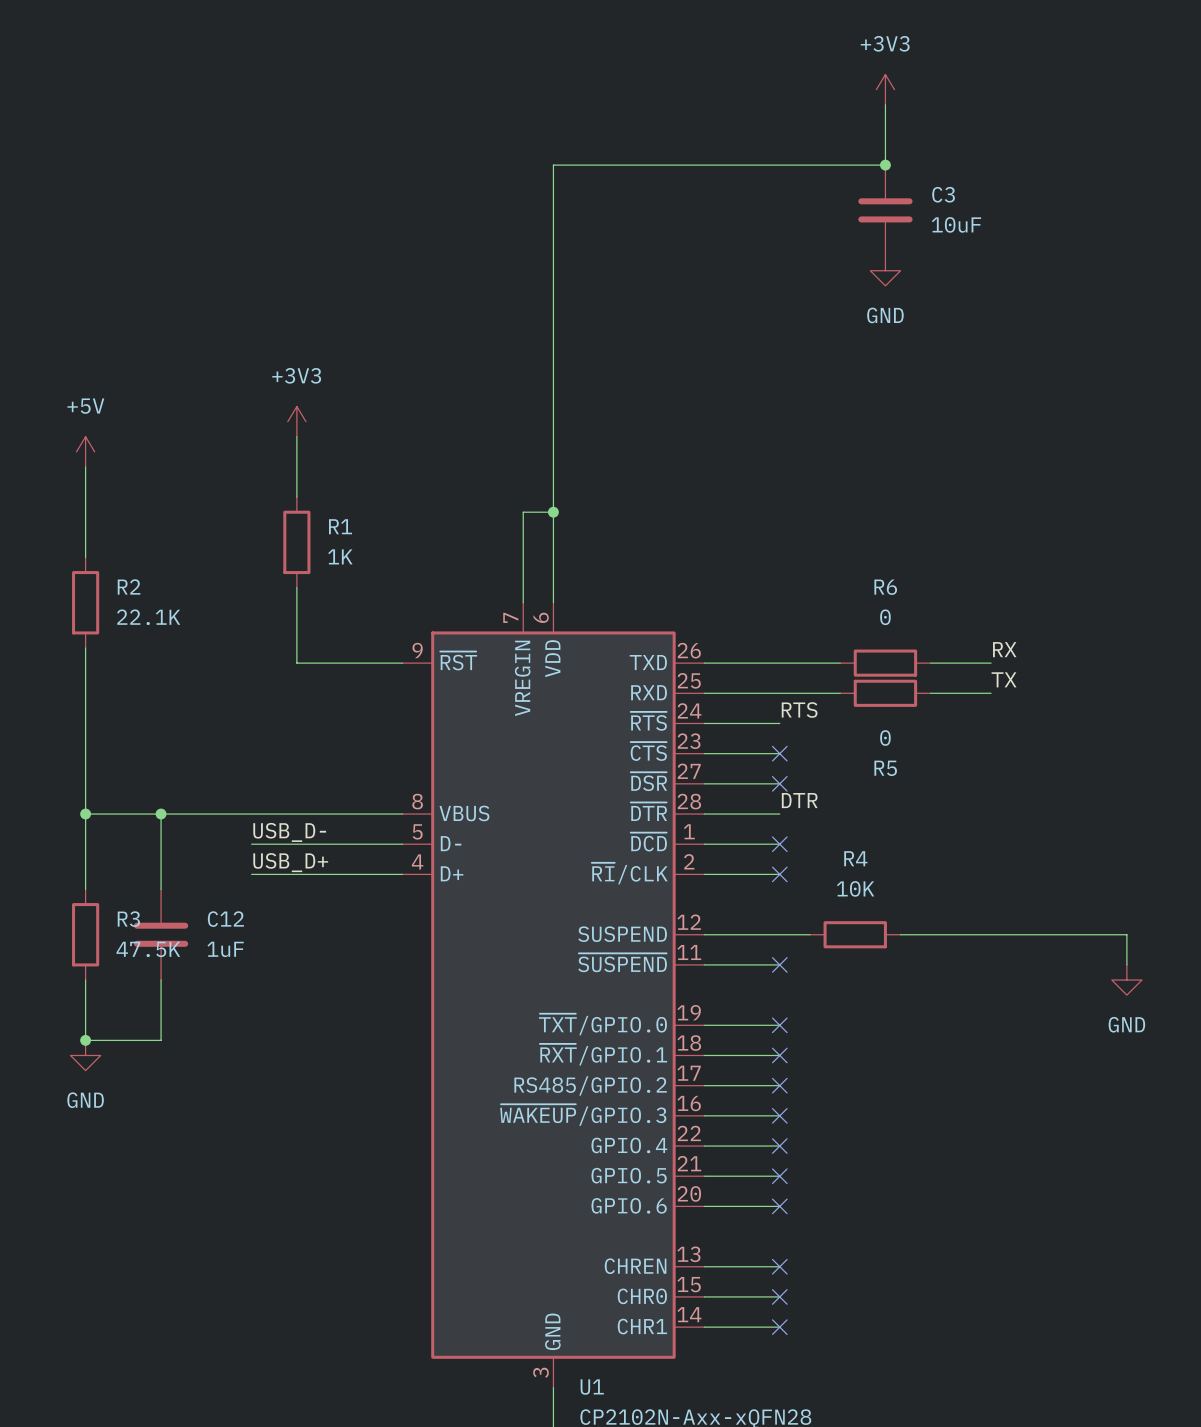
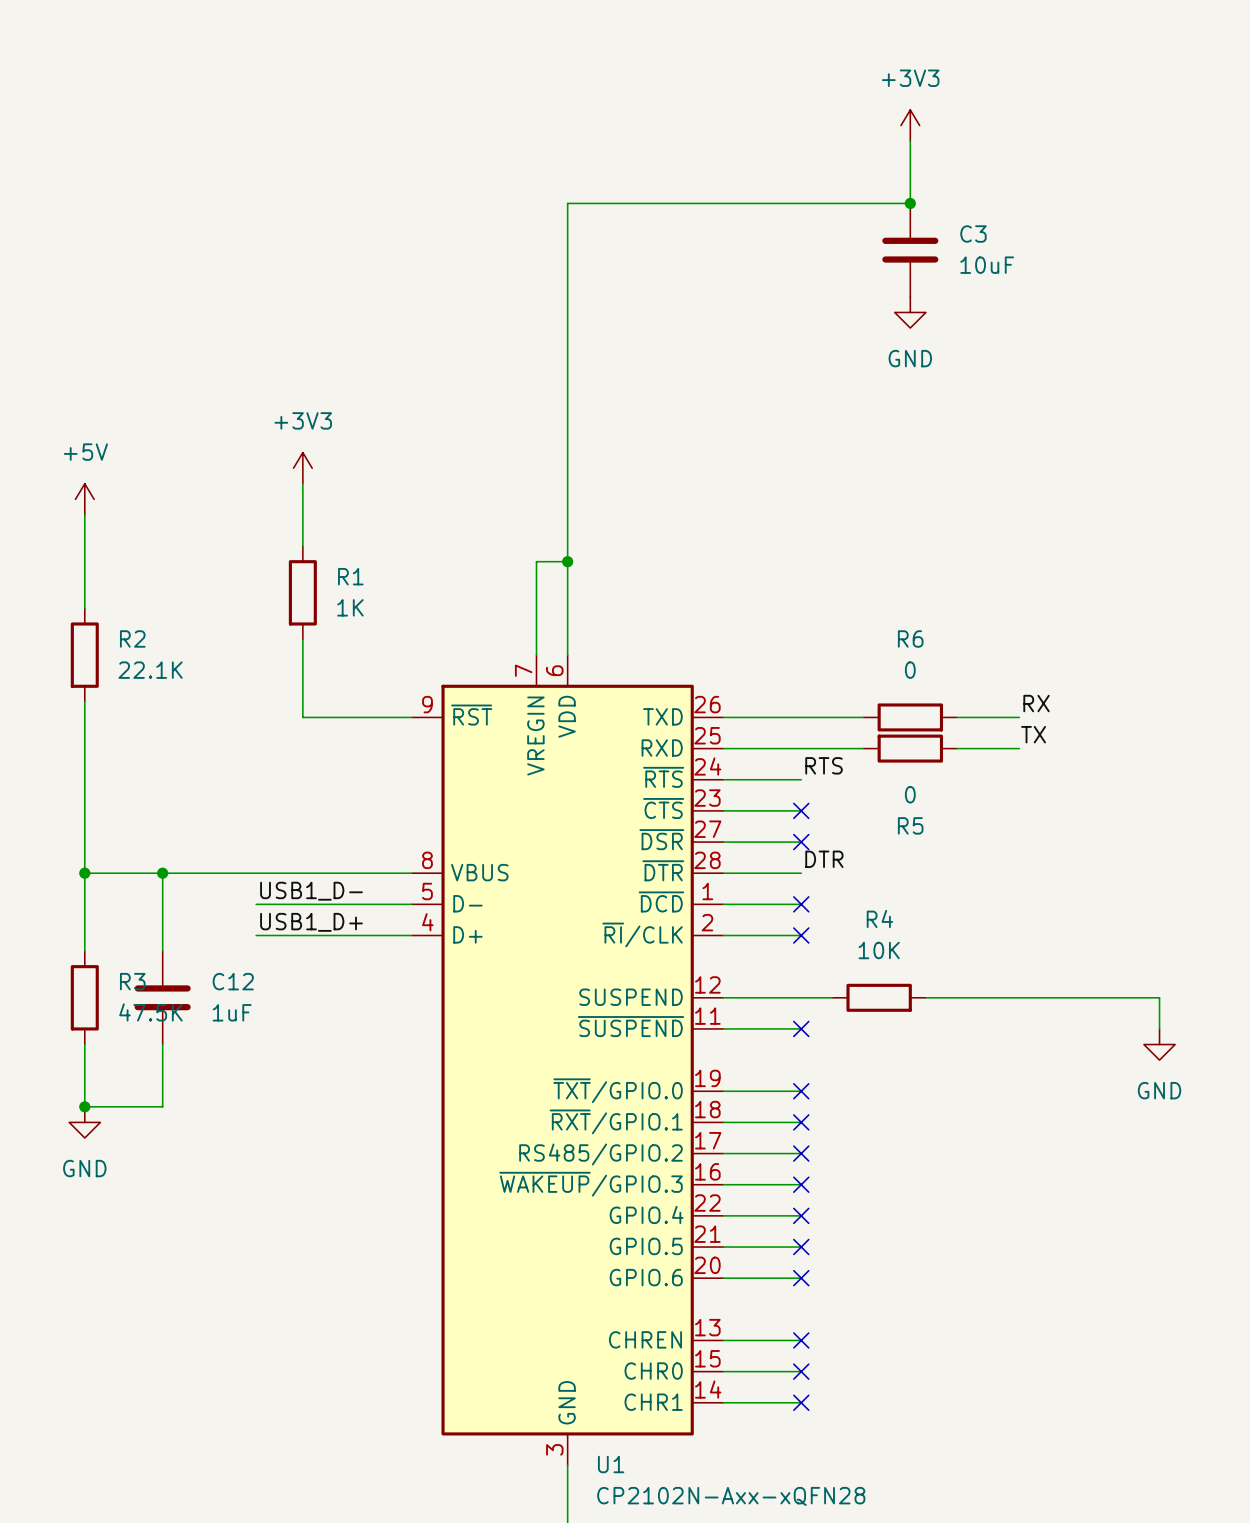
label: USB_D- (289, 832) -> USB1_D- (311, 891)
label: USB_D+ (290, 862) -> USB1_D+ (311, 922)

